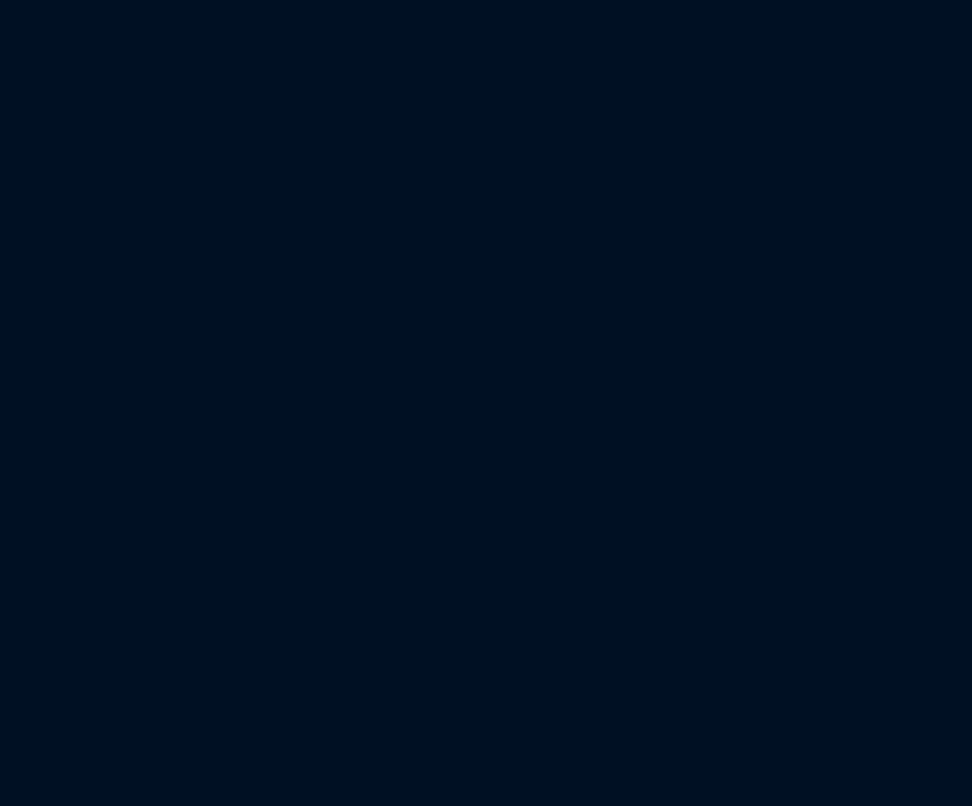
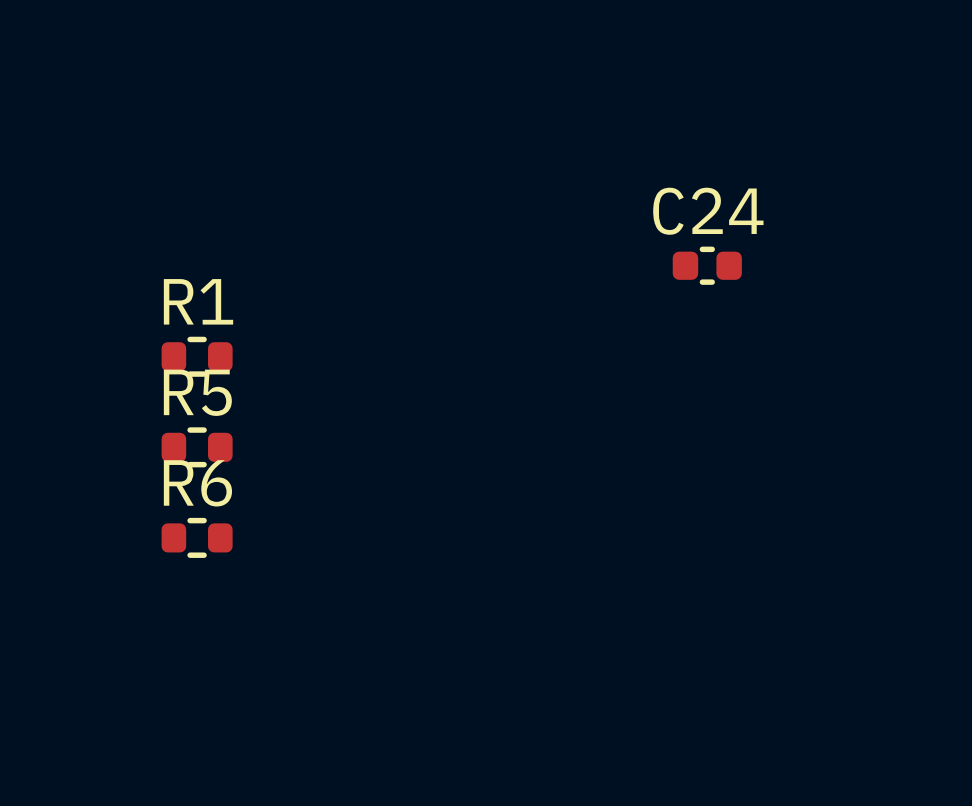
C24: none -> (707, 265)
R1: none -> (197, 356)
R5: none -> (197, 447)
R6: none -> (197, 537)

